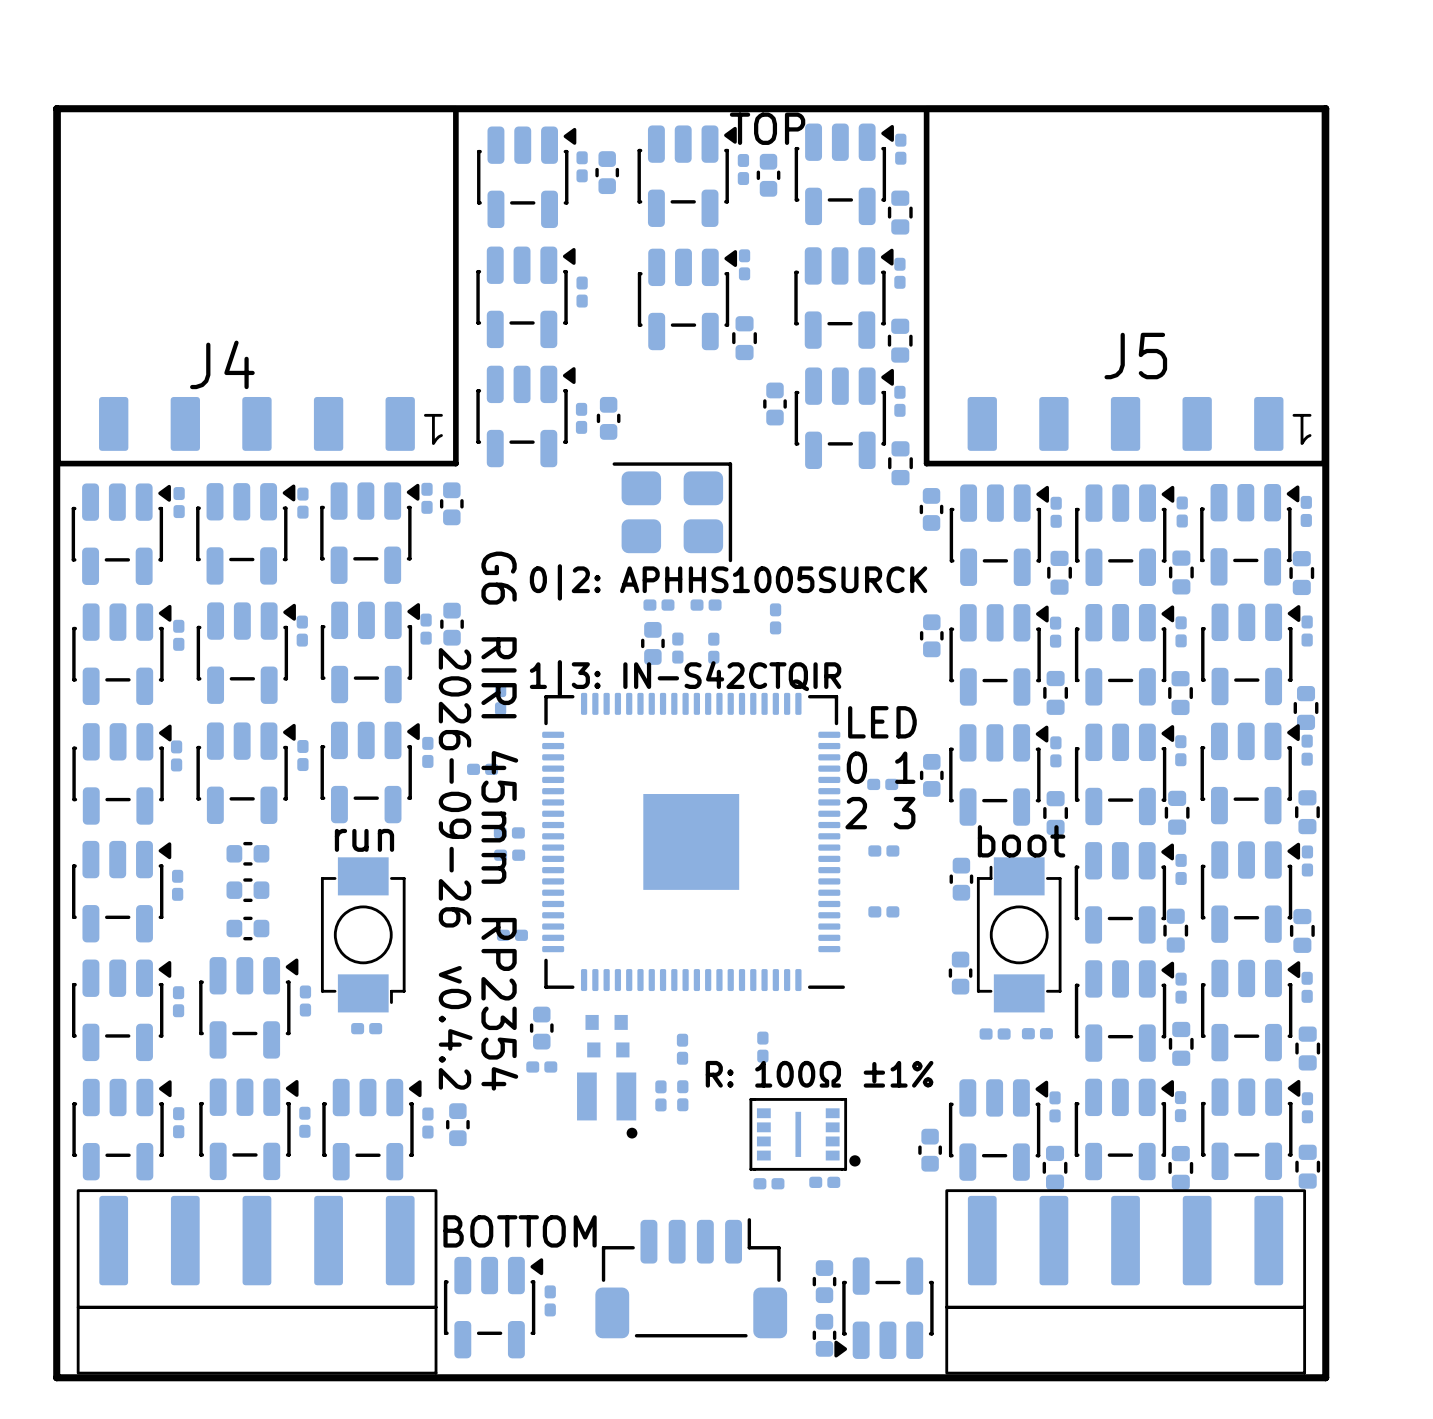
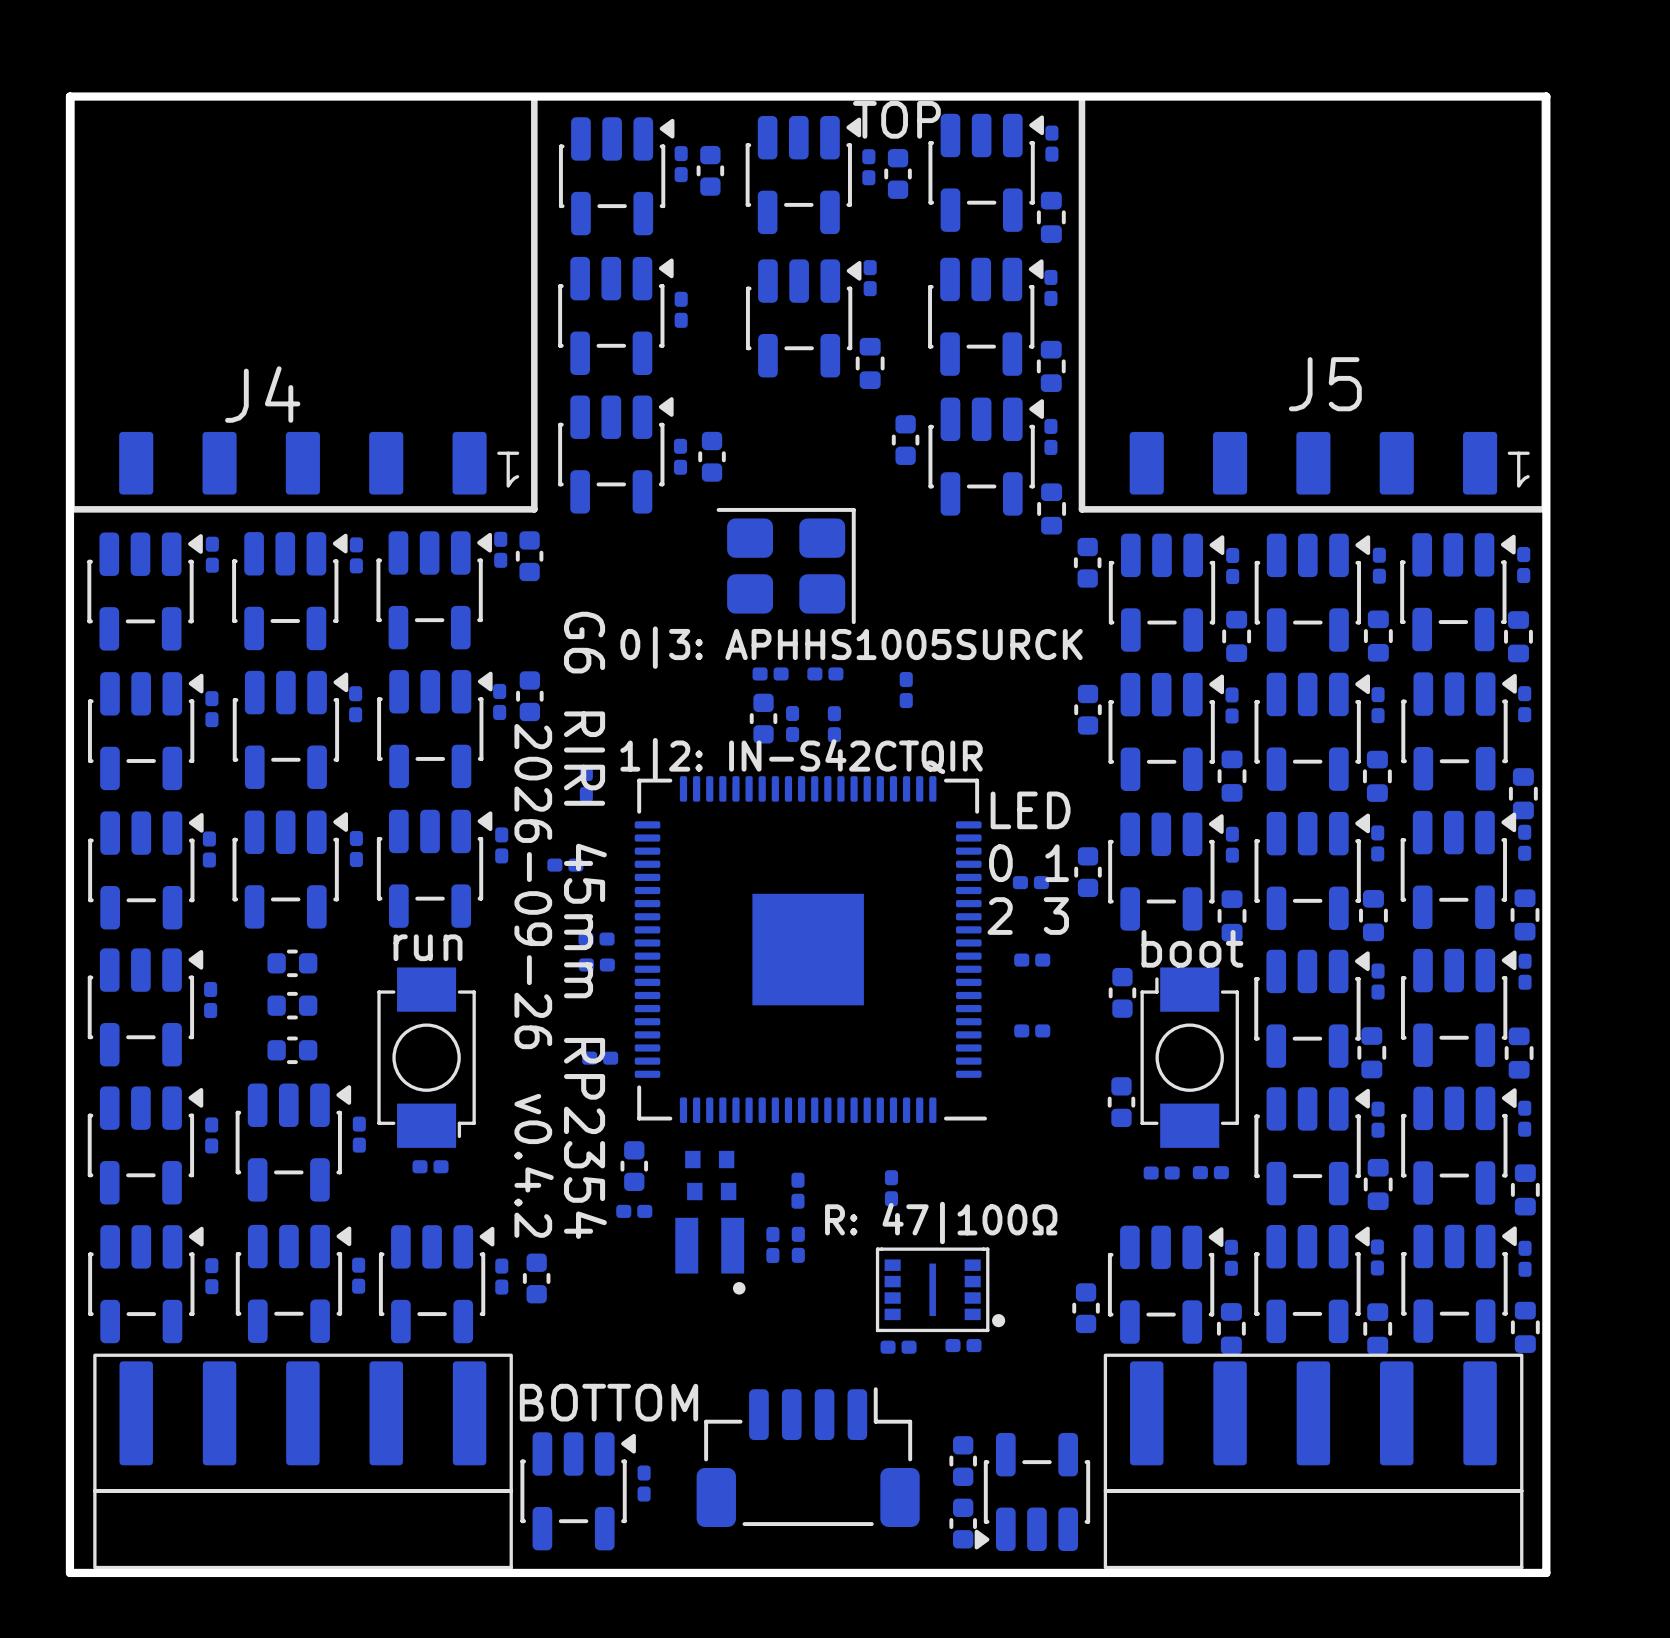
text: 0|2: APHHS1005SURCK (728, 582) -> 0|3: APHHS1005SURCK (851, 647)
text: 1|3: IN-S42CTQIR (685, 678) -> 1|2: IN-S42CTQIR (801, 759)
text: R: 100Ω ±1% (819, 1074) -> R: 47|100Ω (941, 1222)

